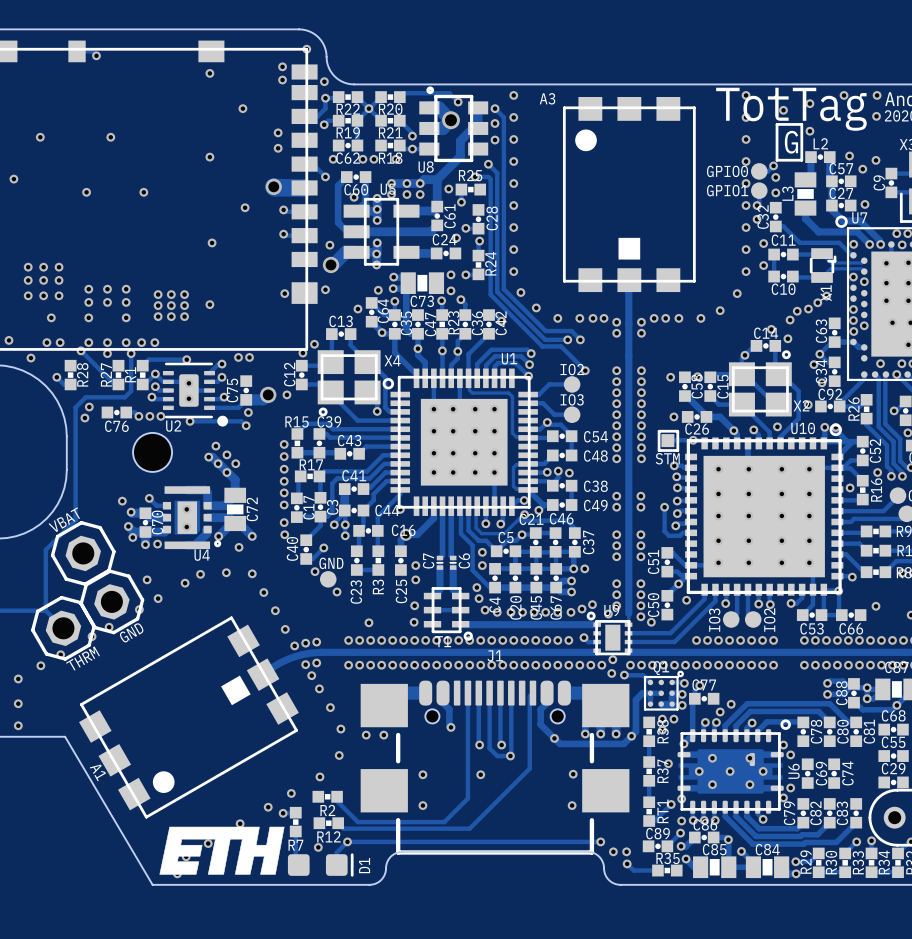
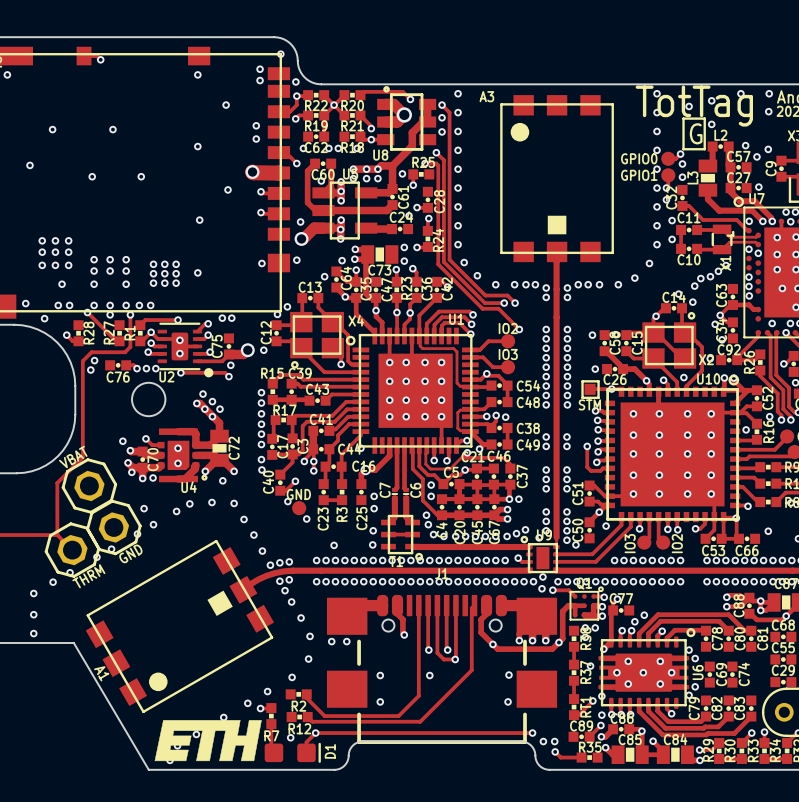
via: (864, 325) -> none

